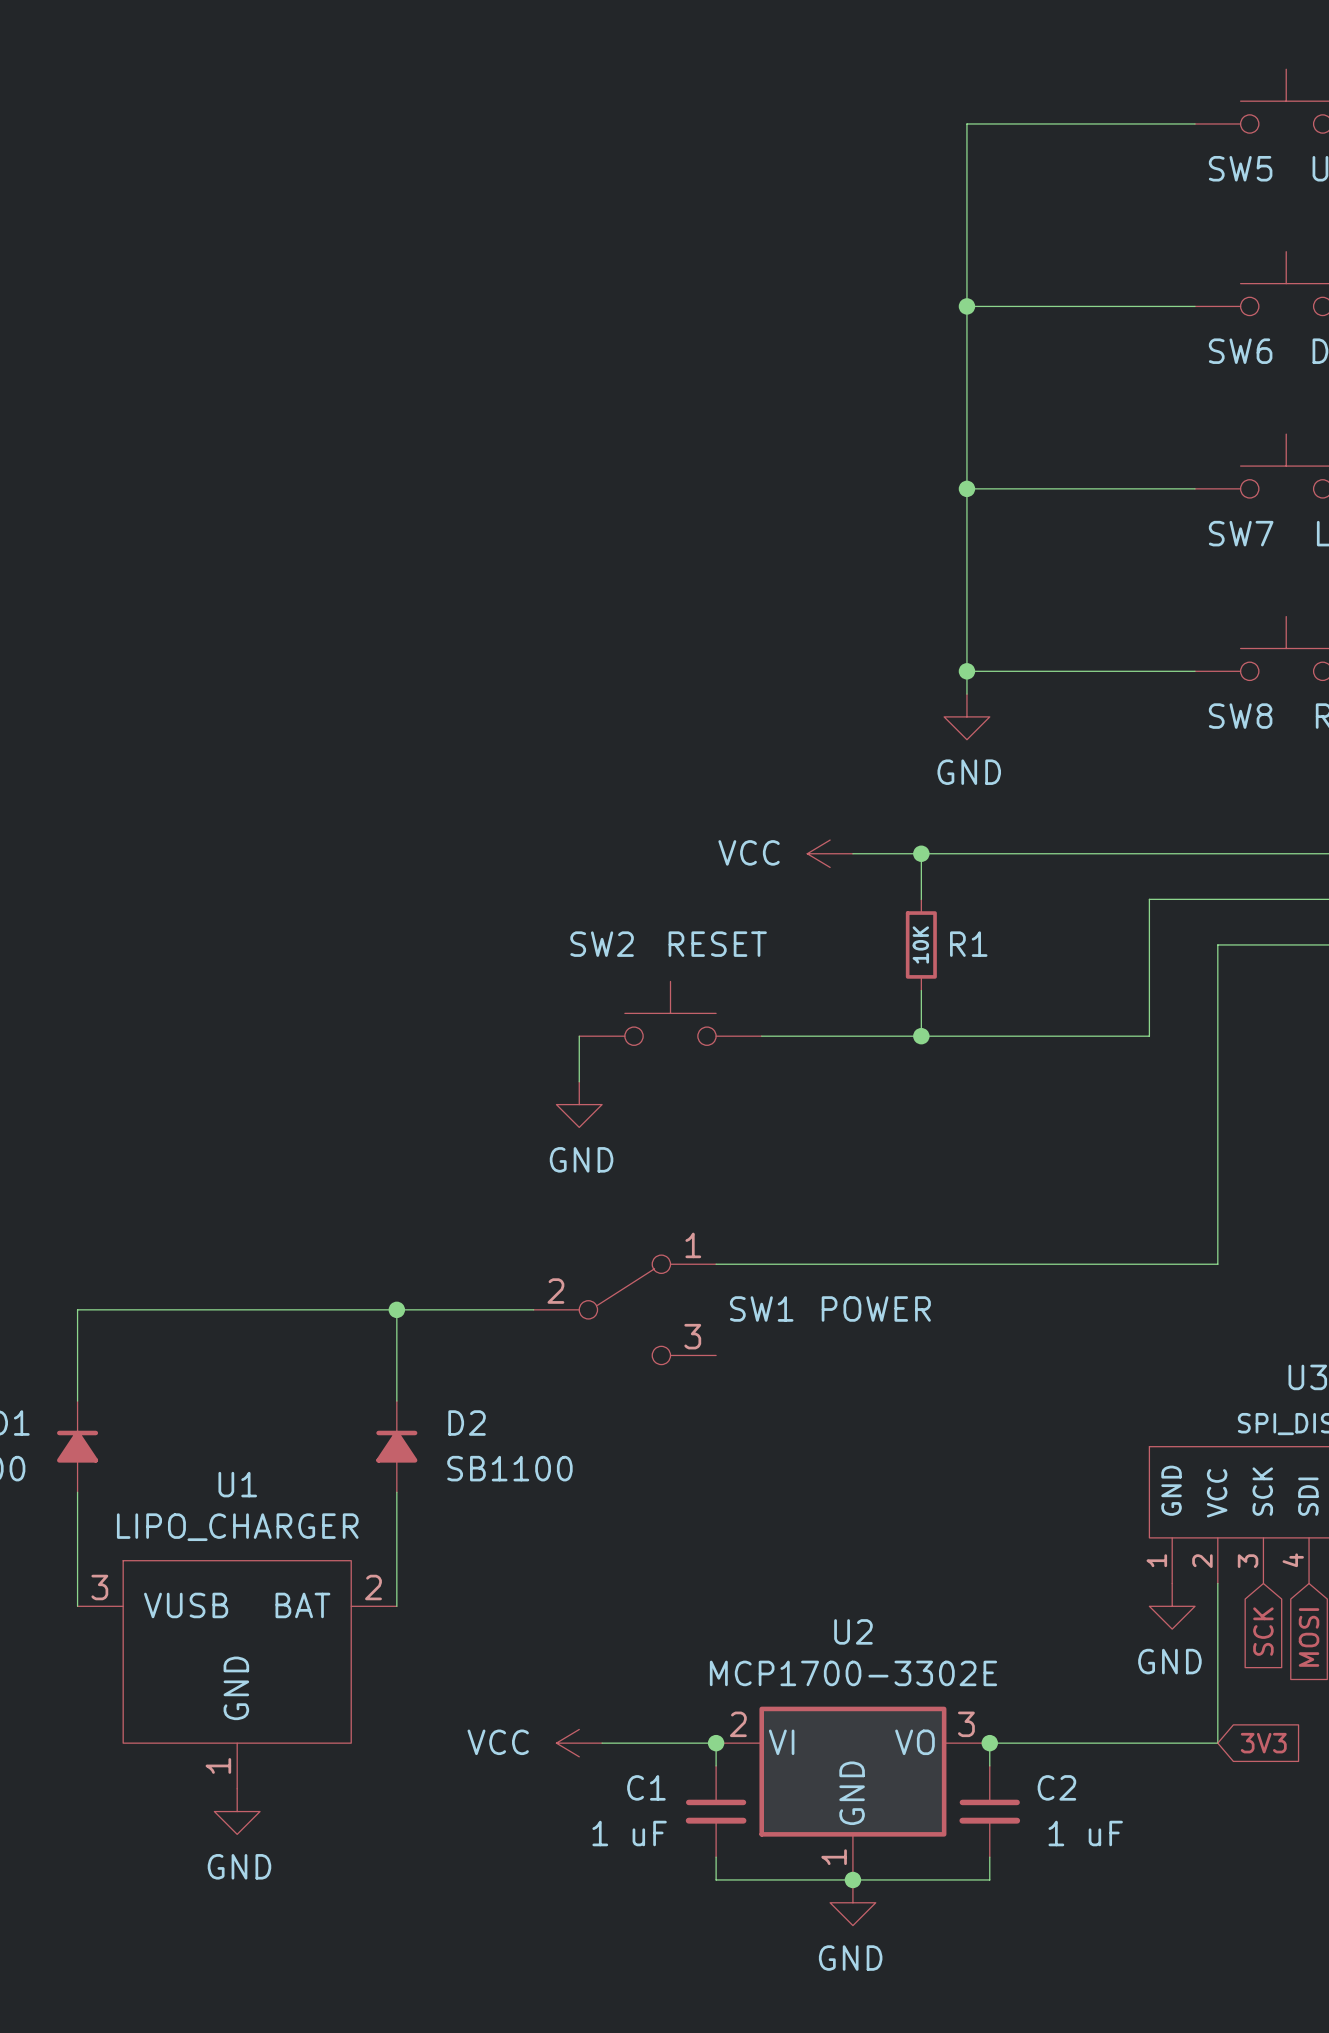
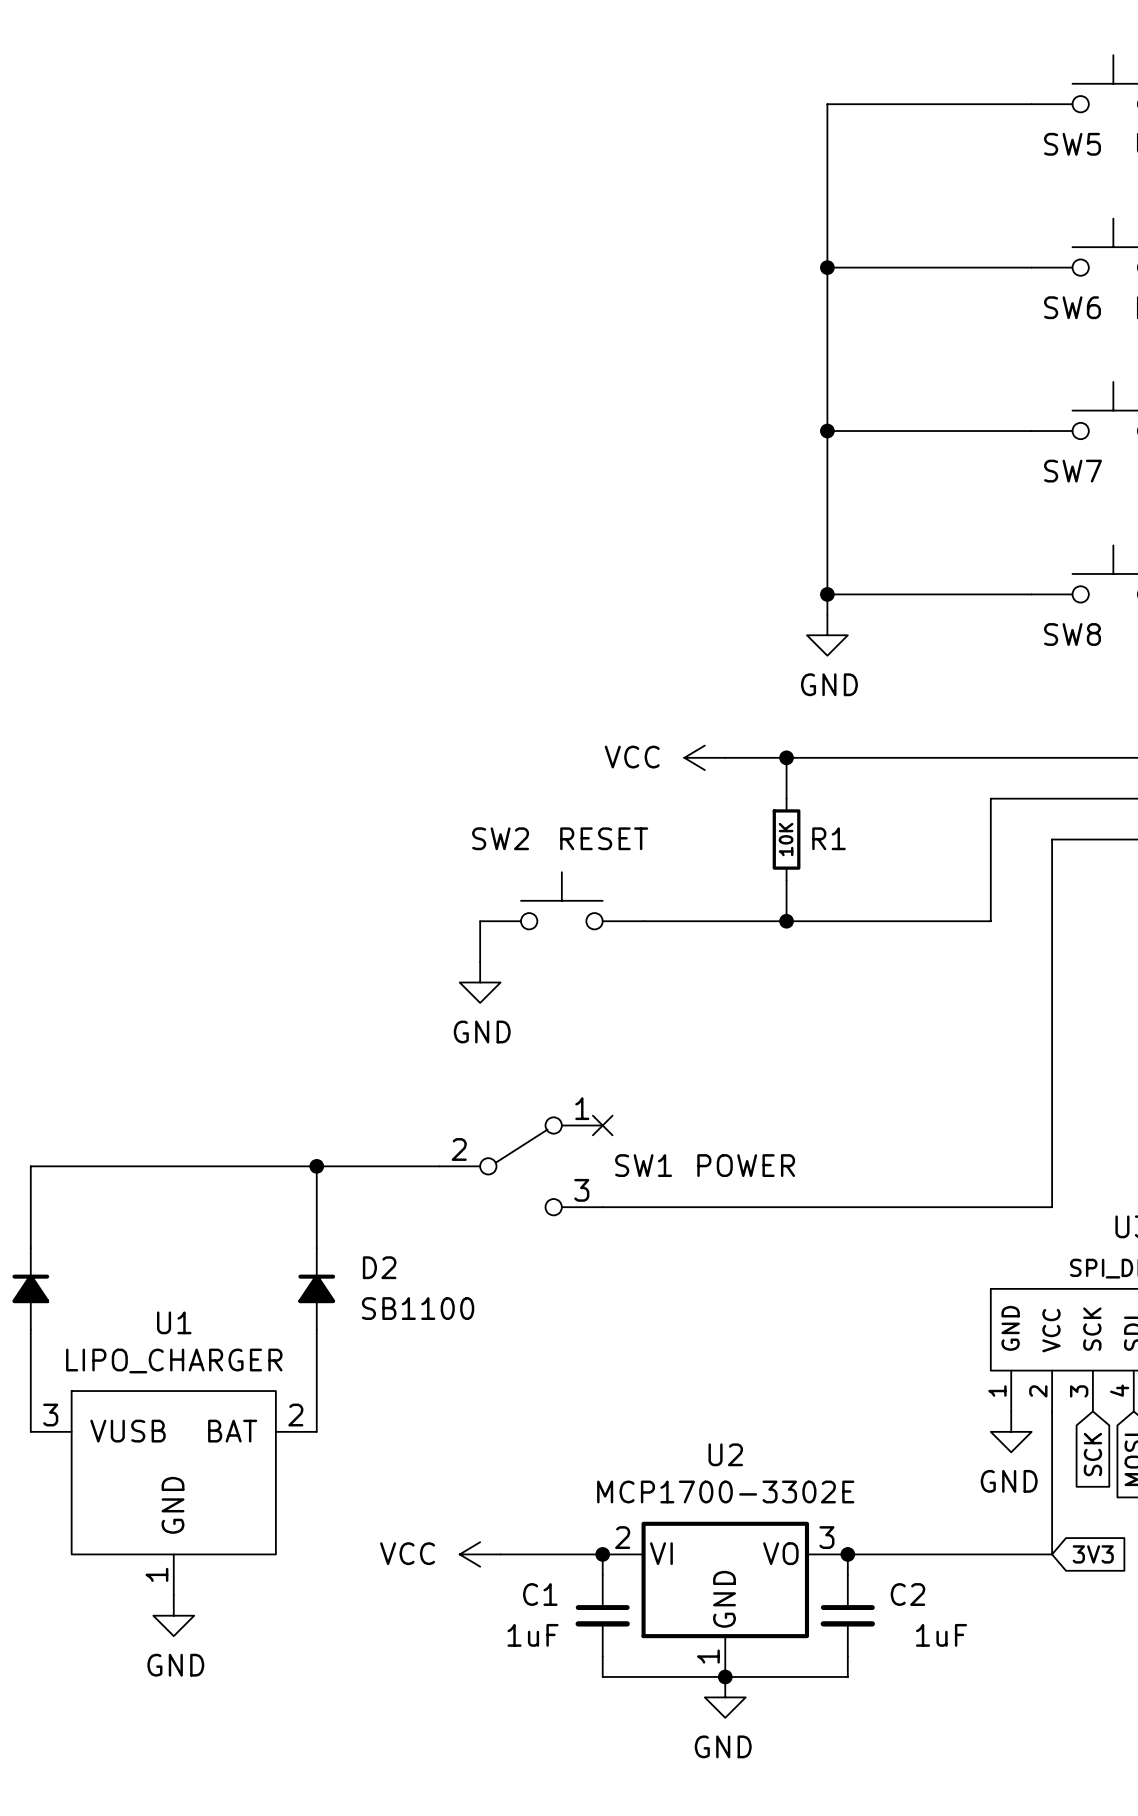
wire: (716, 1264) (1217, 1264) -> (602, 1207) (1052, 1207) (1052, 1125)
no-connect mark: none -> (602, 1125)
C1 value: 1 uF (629, 1833) -> 1uF (533, 1635)
C2 value: 1 uF (1085, 1833) -> 1uF (941, 1635)

